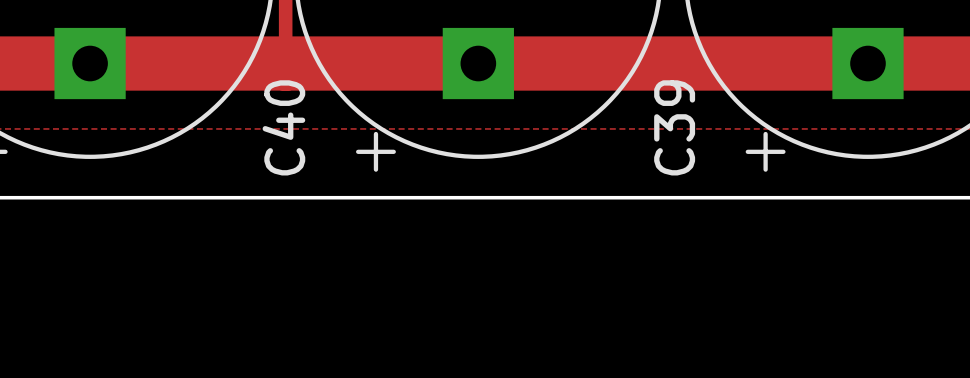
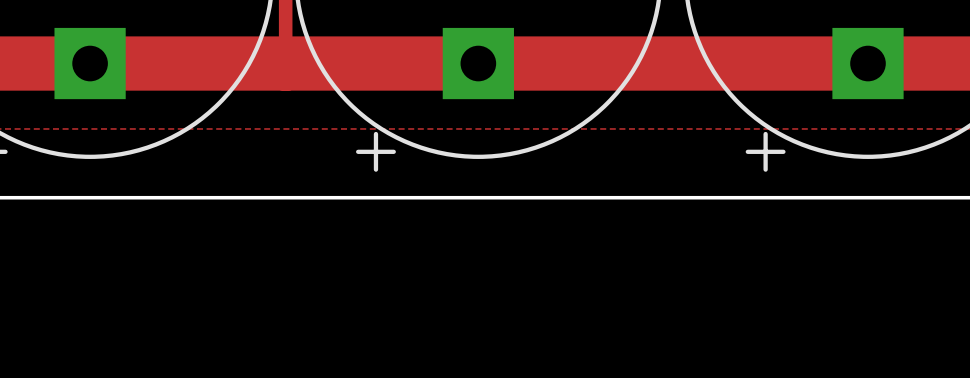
C40 name: C40 (283, 127) -> none
C39 name: C39 (674, 127) -> none

